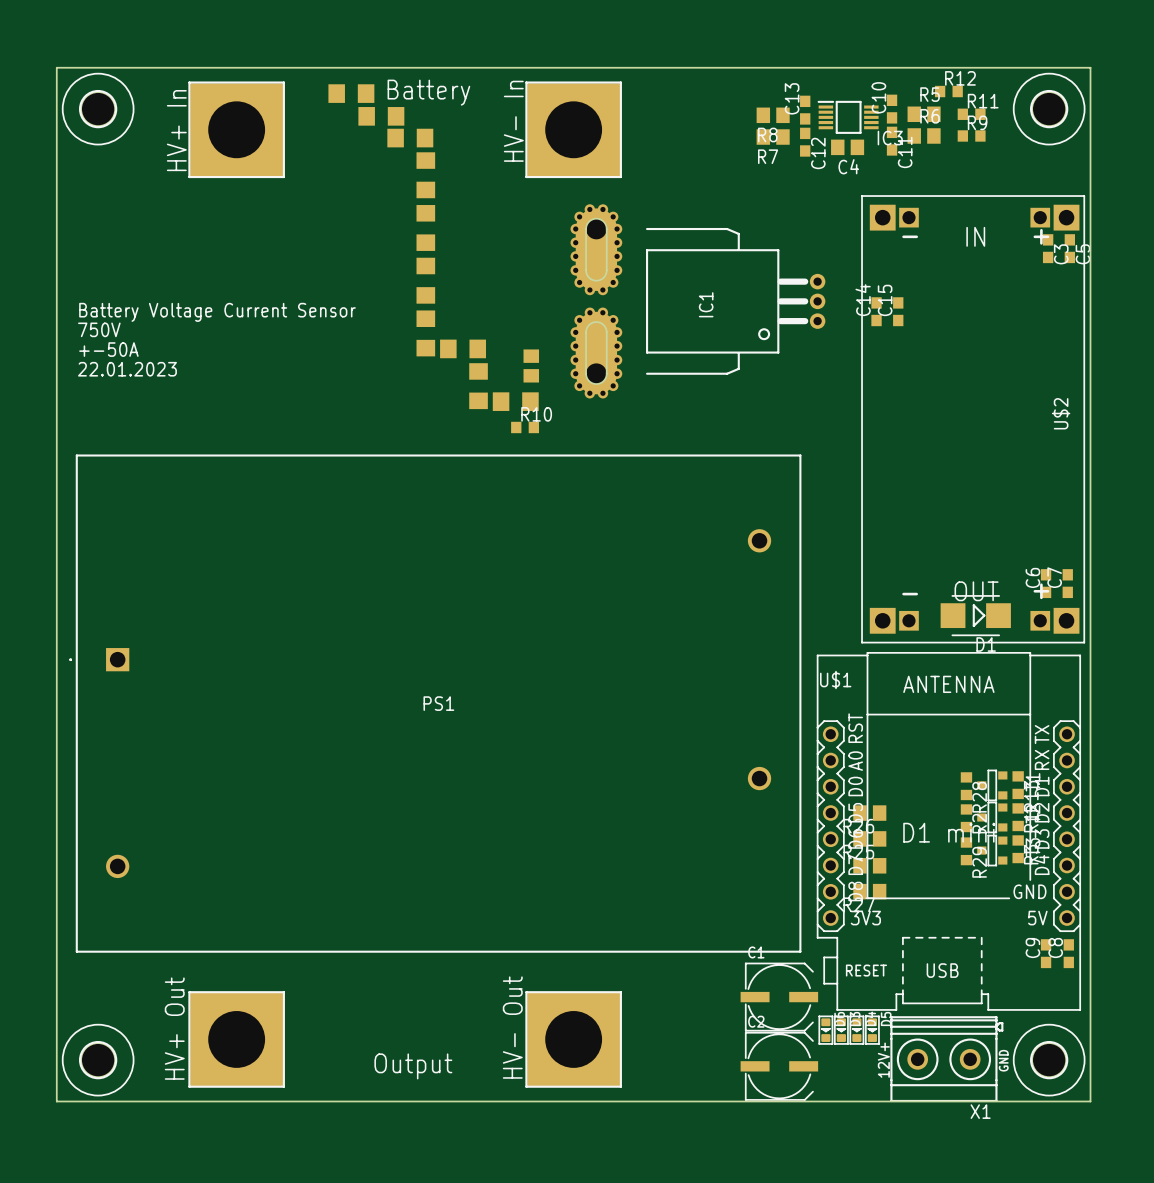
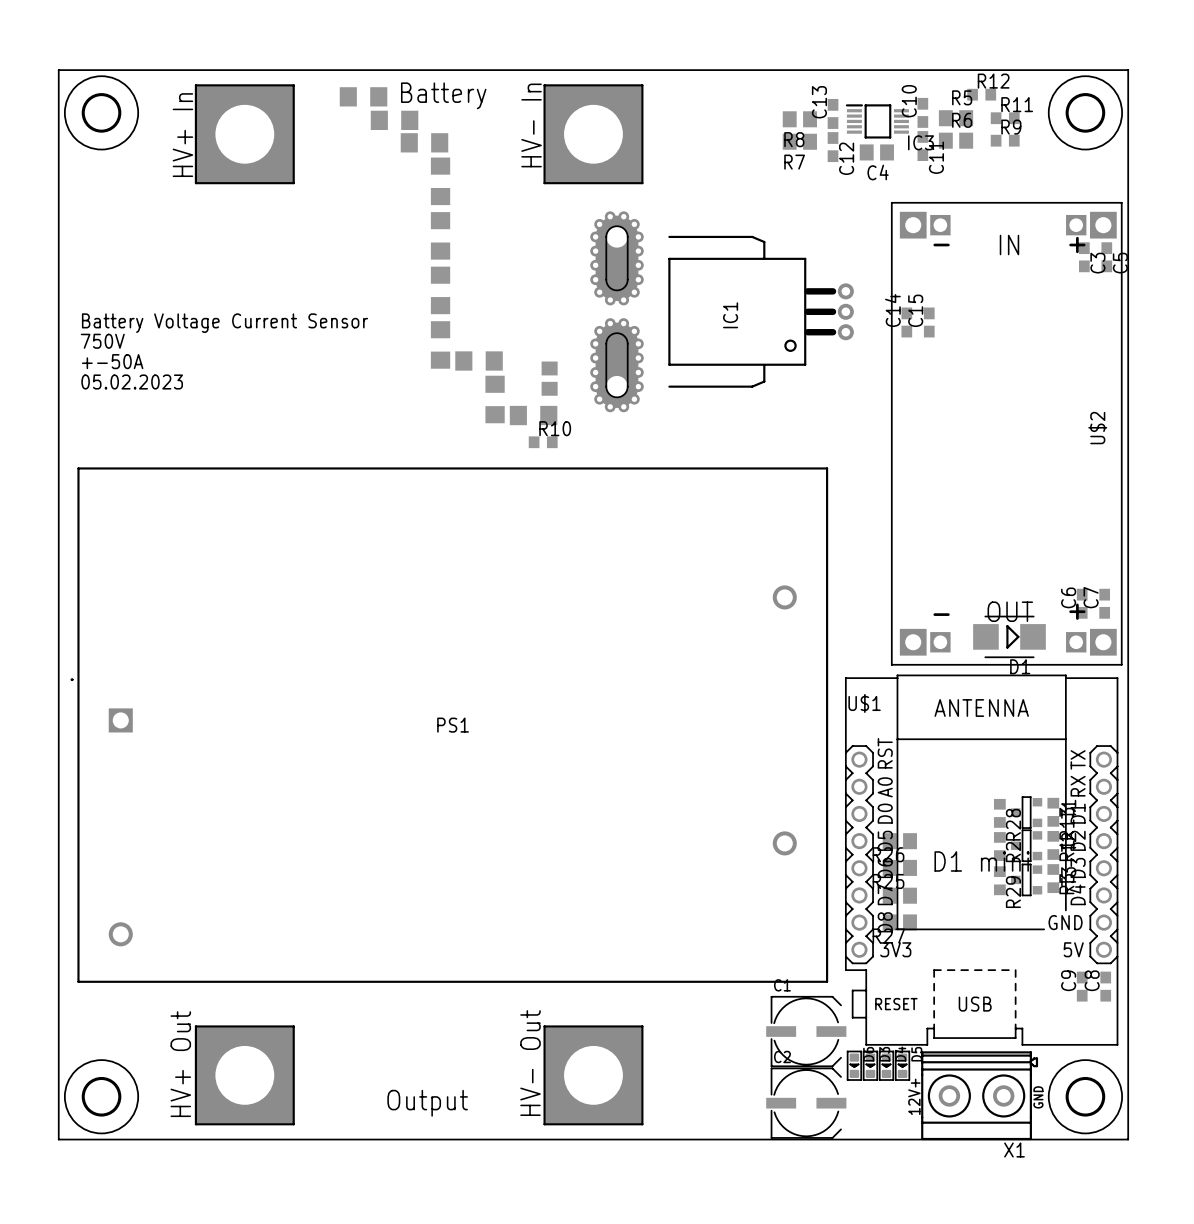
text: 22.01.2023 (127, 369) -> 05.02.2023 (132, 382)
PS1 footprint: [69, 454, 802, 953] -> [71, 467, 829, 983]

